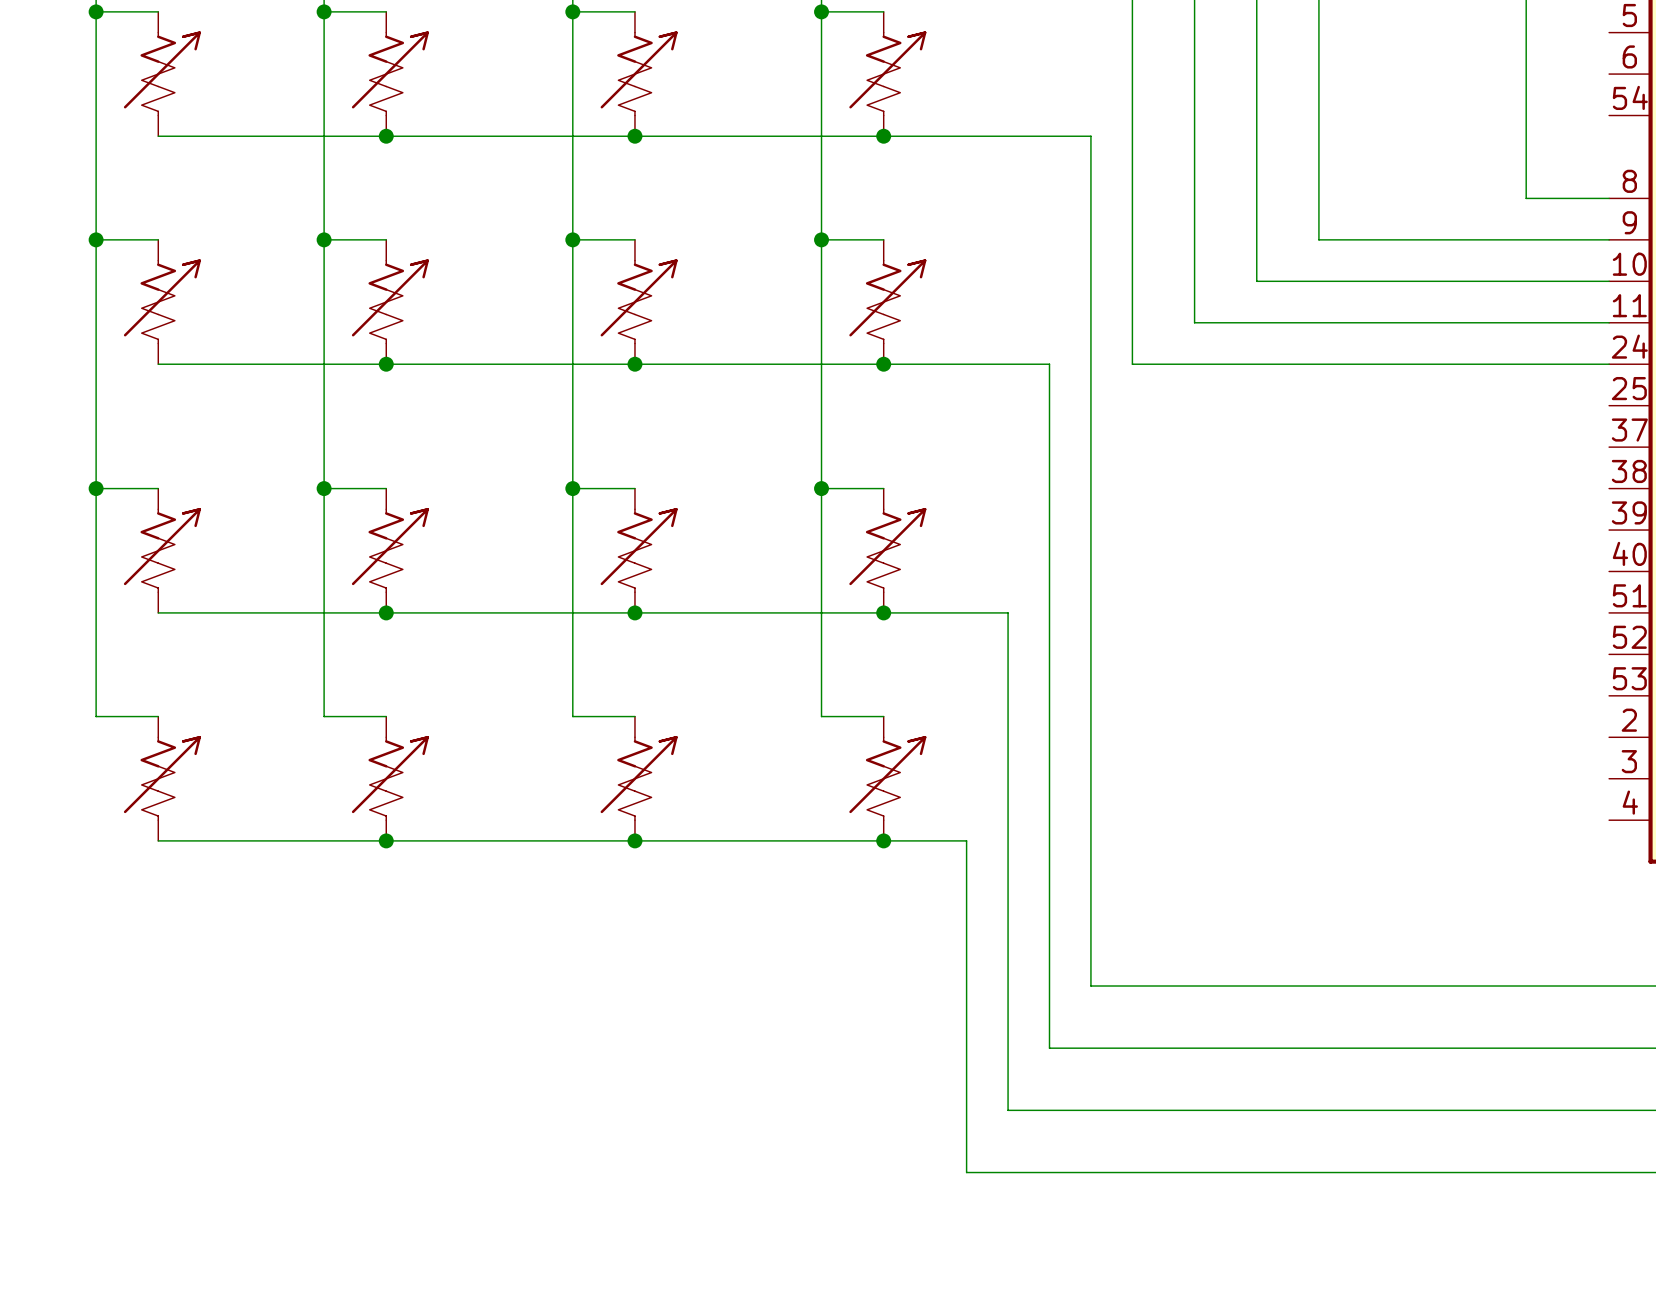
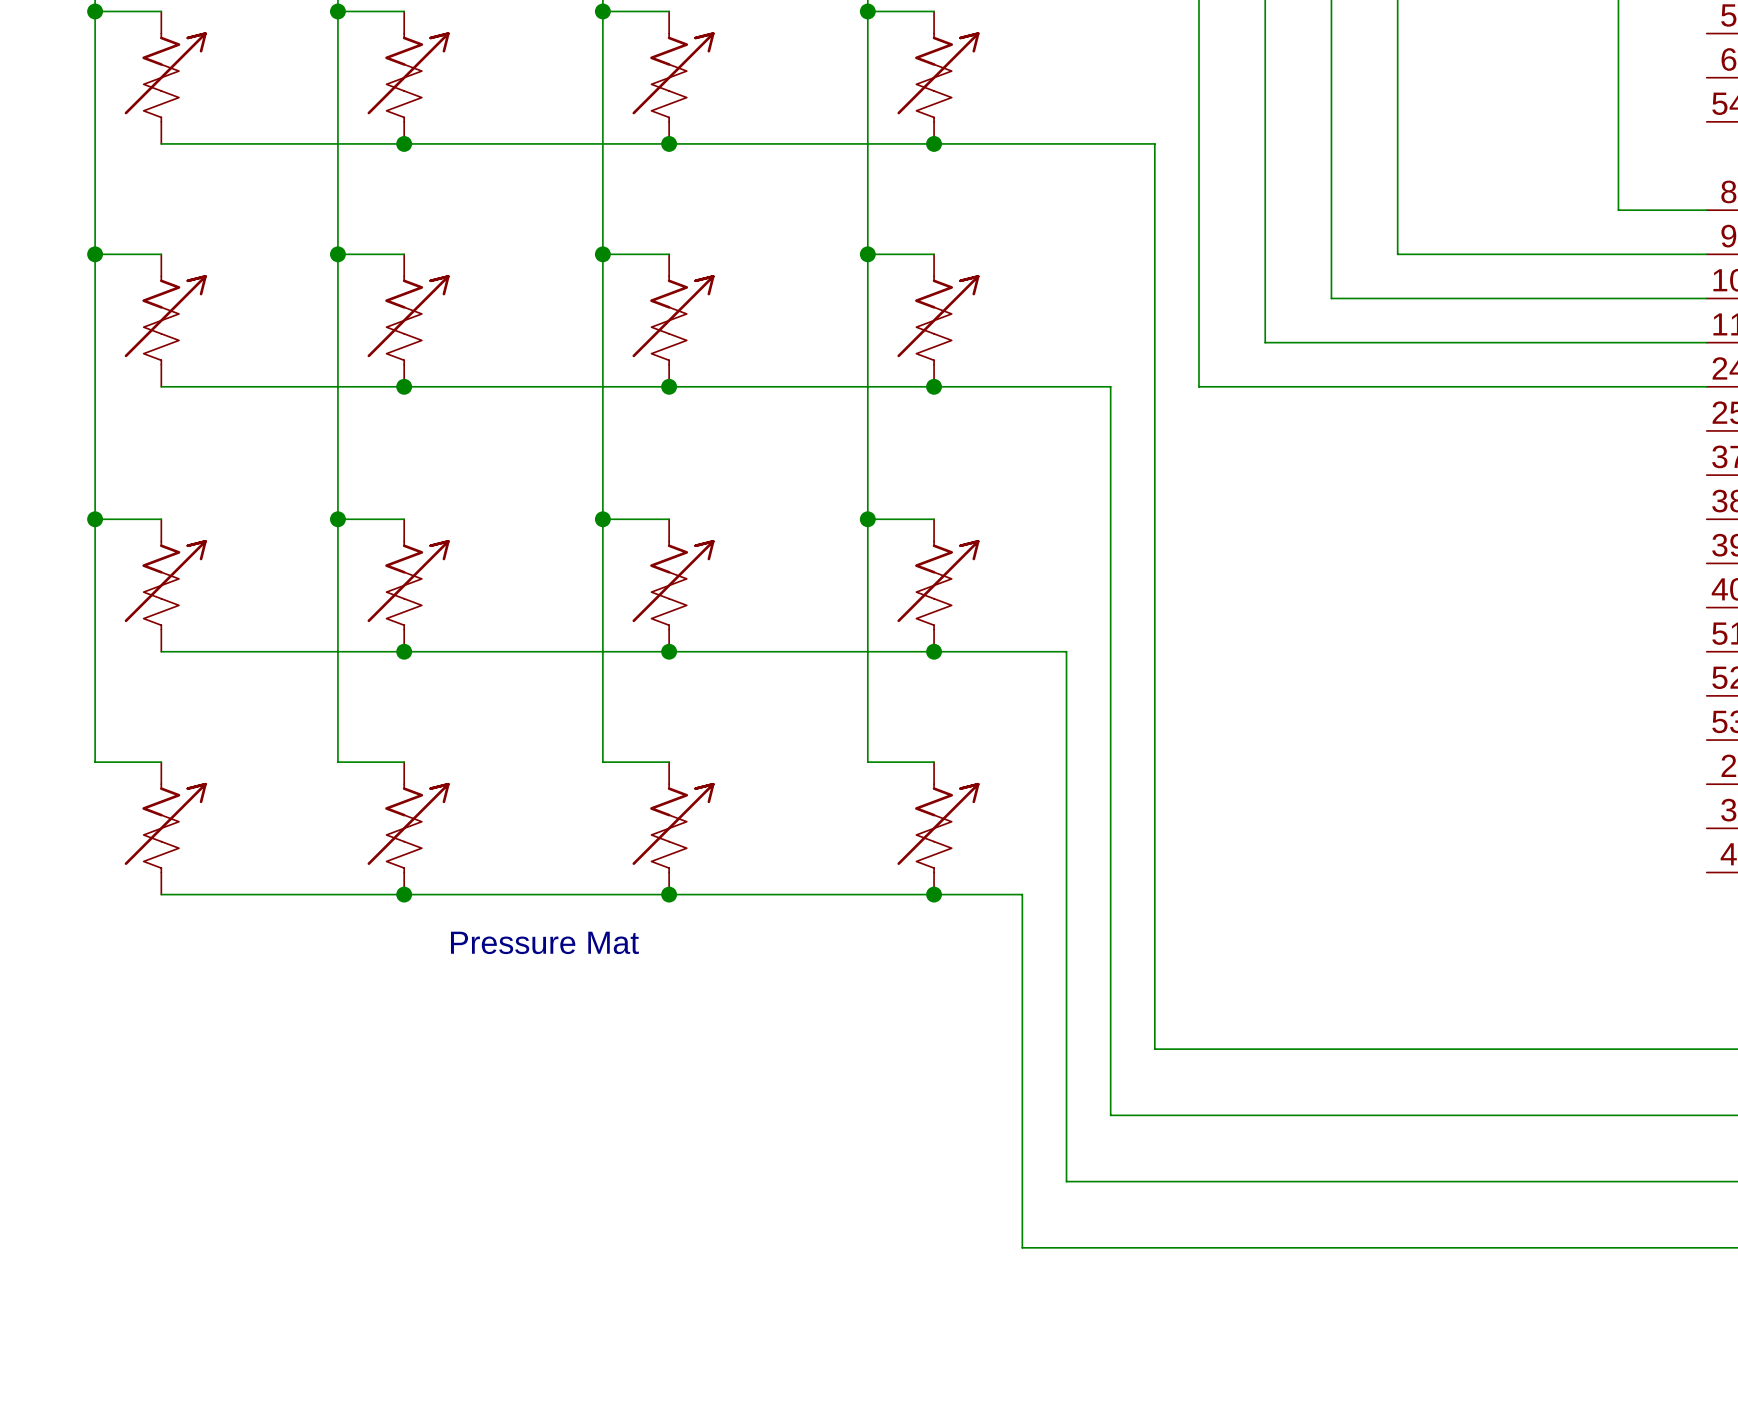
text: none -> Pressure Mat (544, 942)

